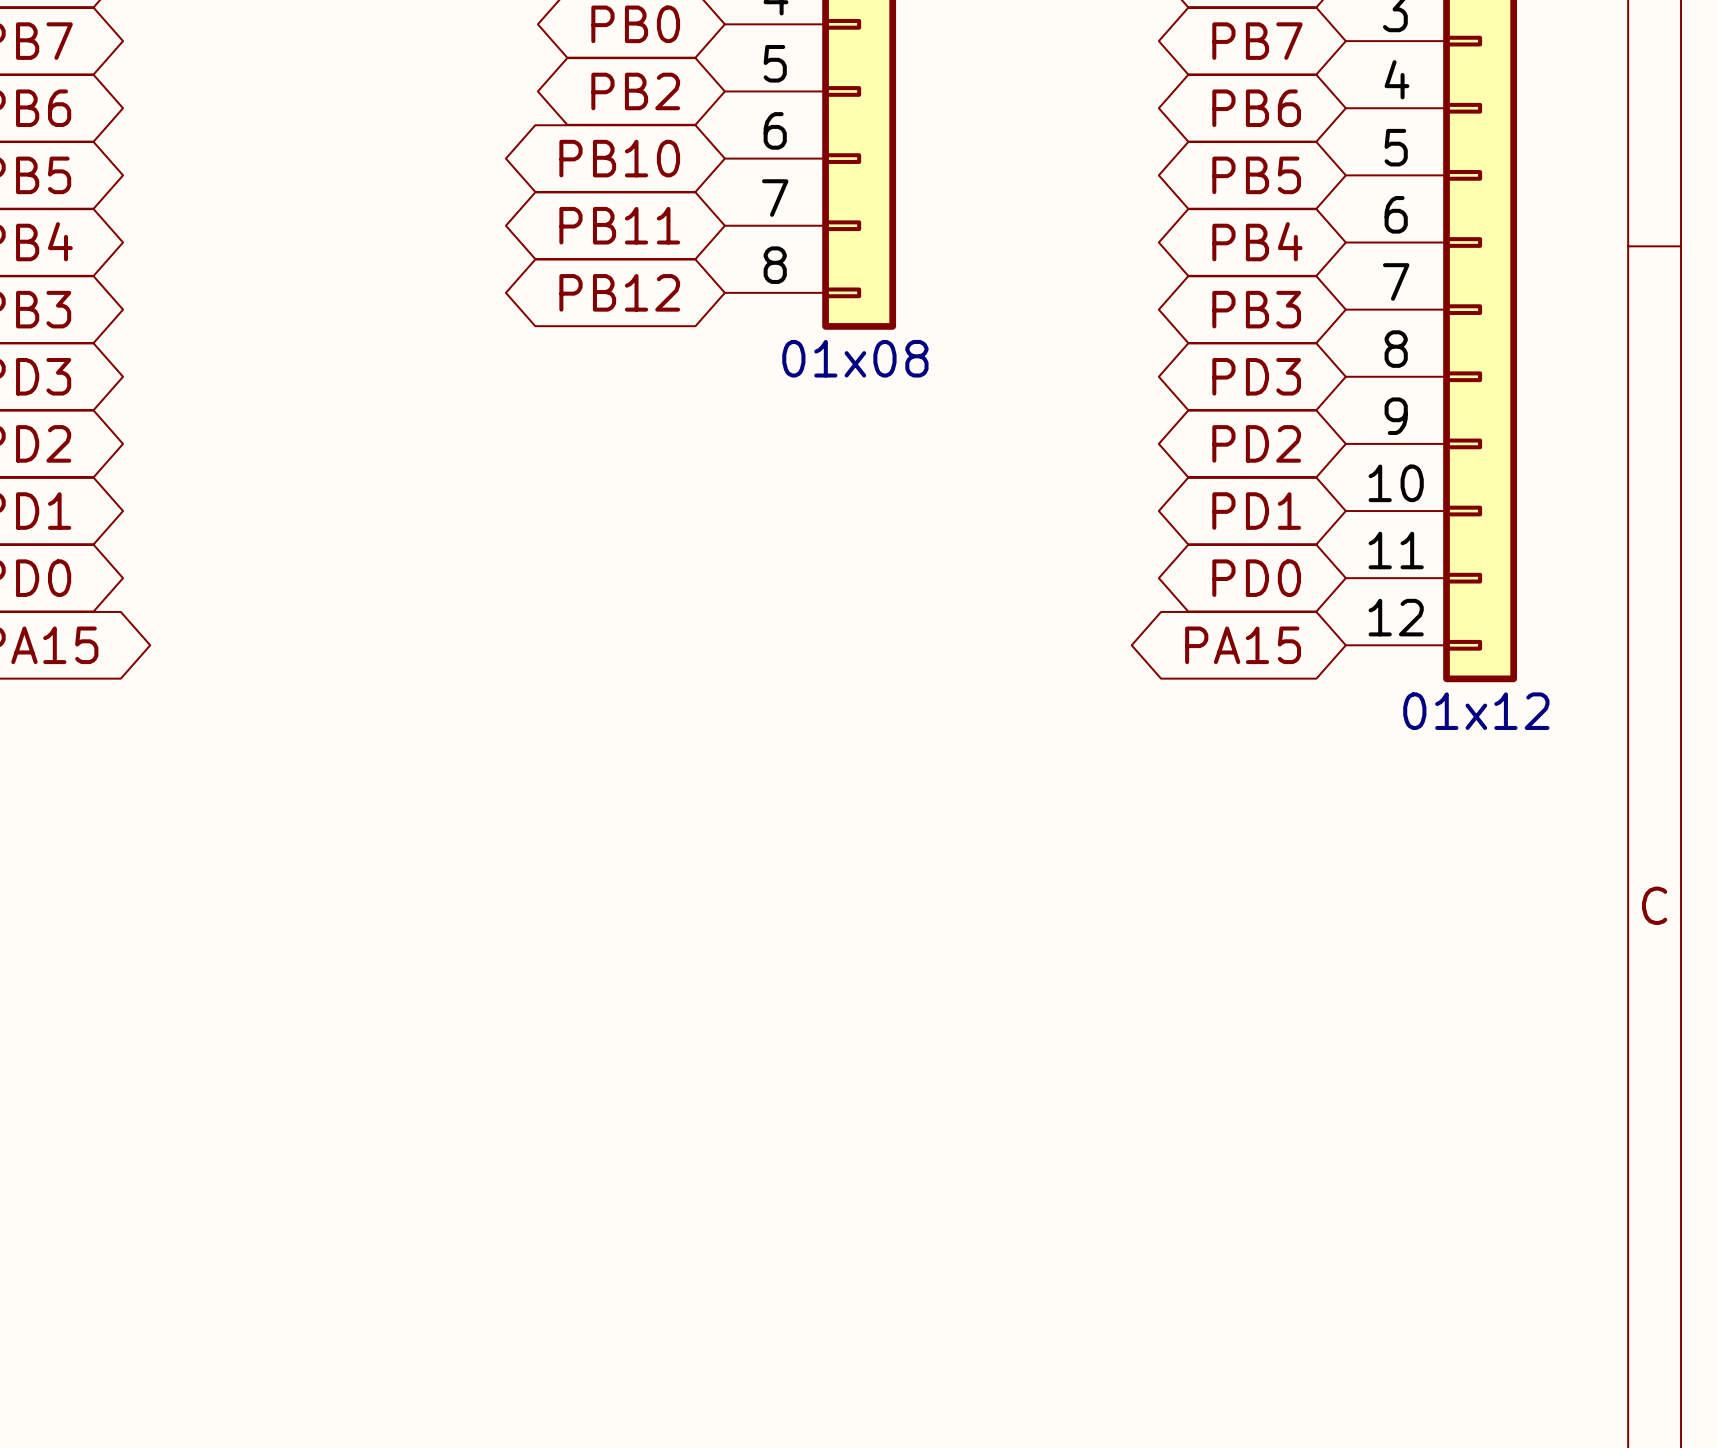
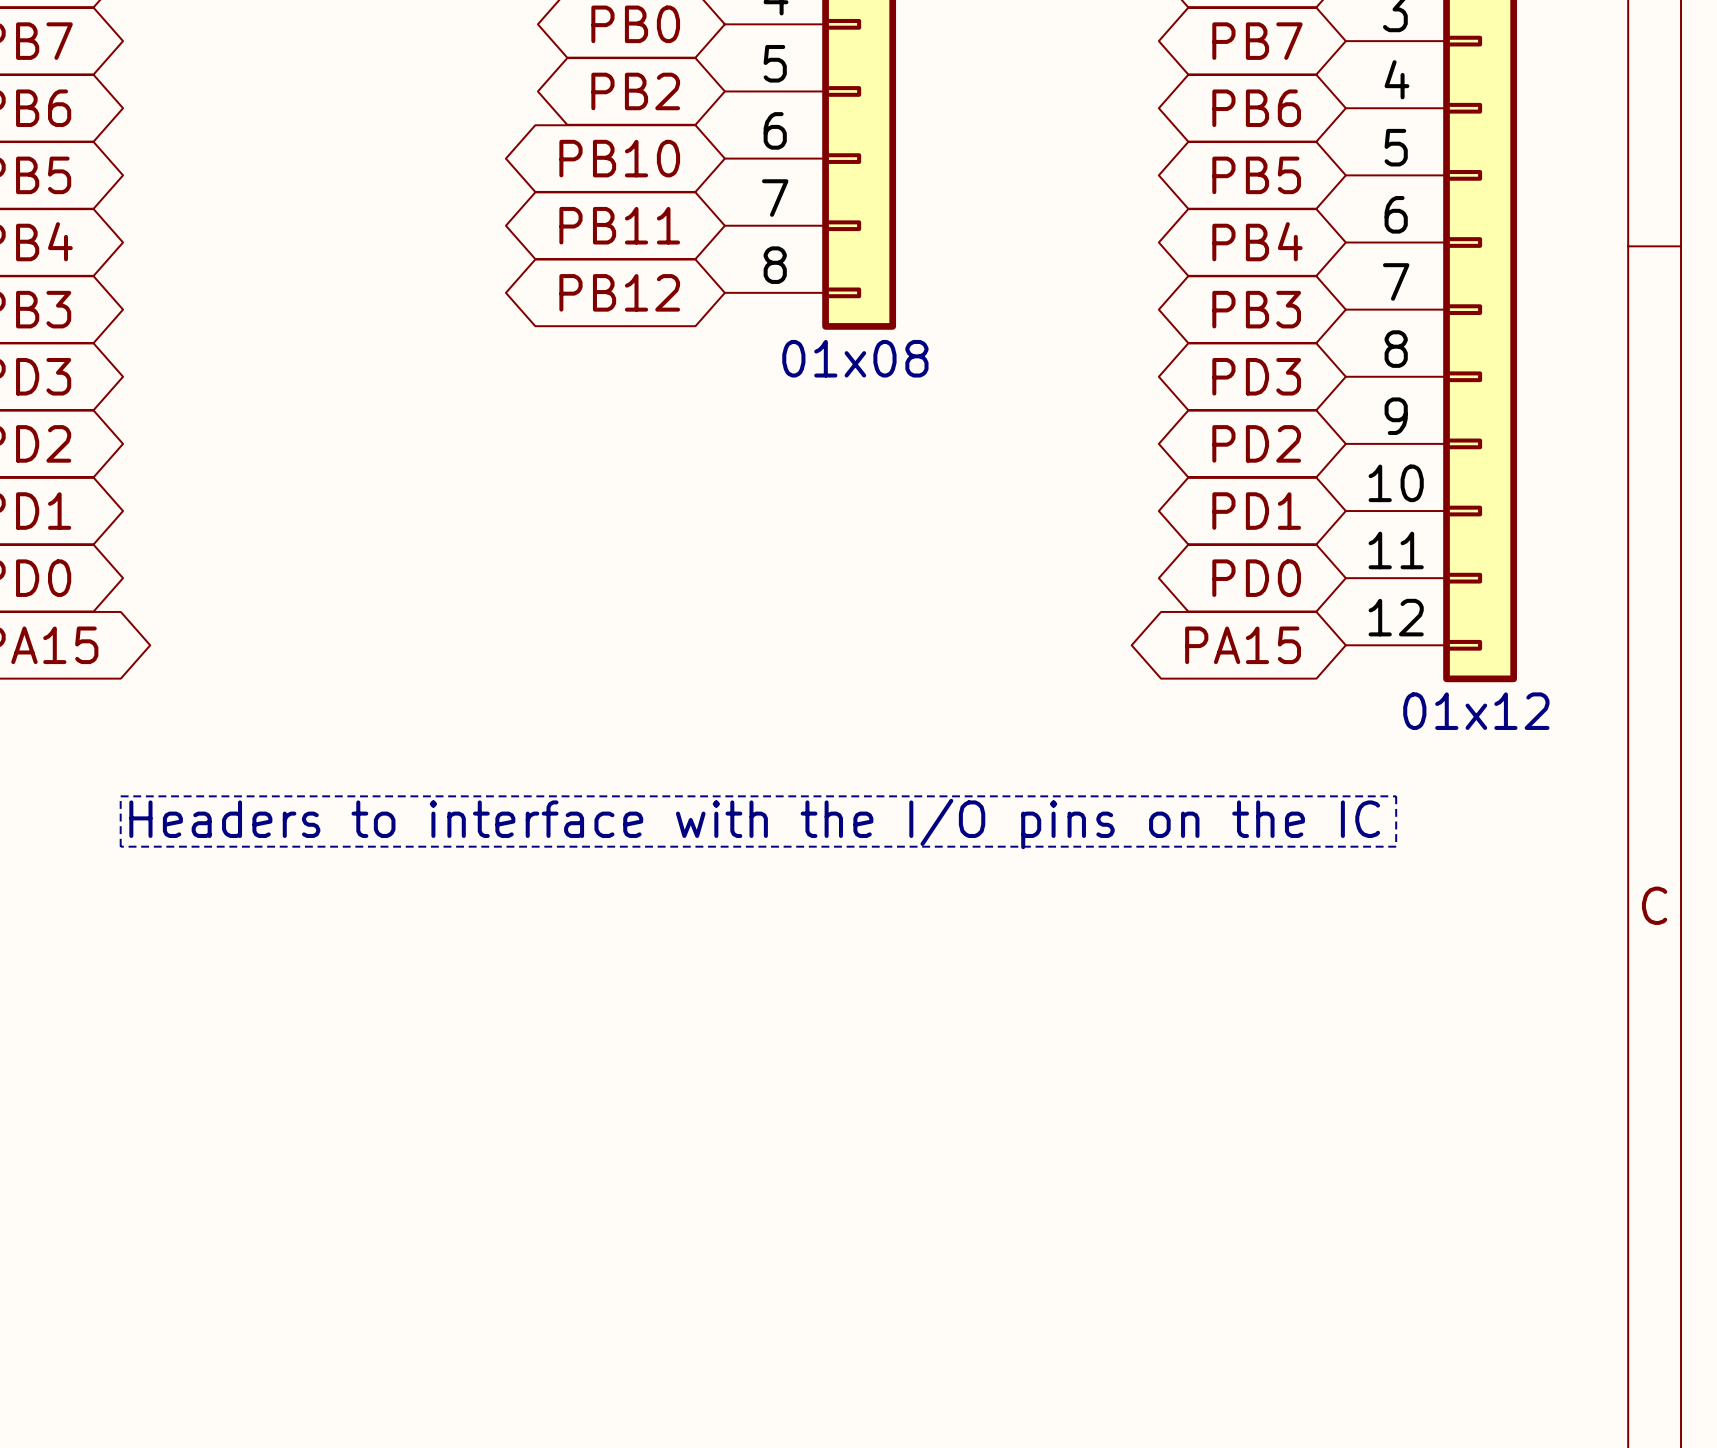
line: none -> (120, 796) (120, 846) (1396, 846) (1396, 796) (120, 796)
text: none -> Headers to interface with the I/O pins on the IC (754, 823)

